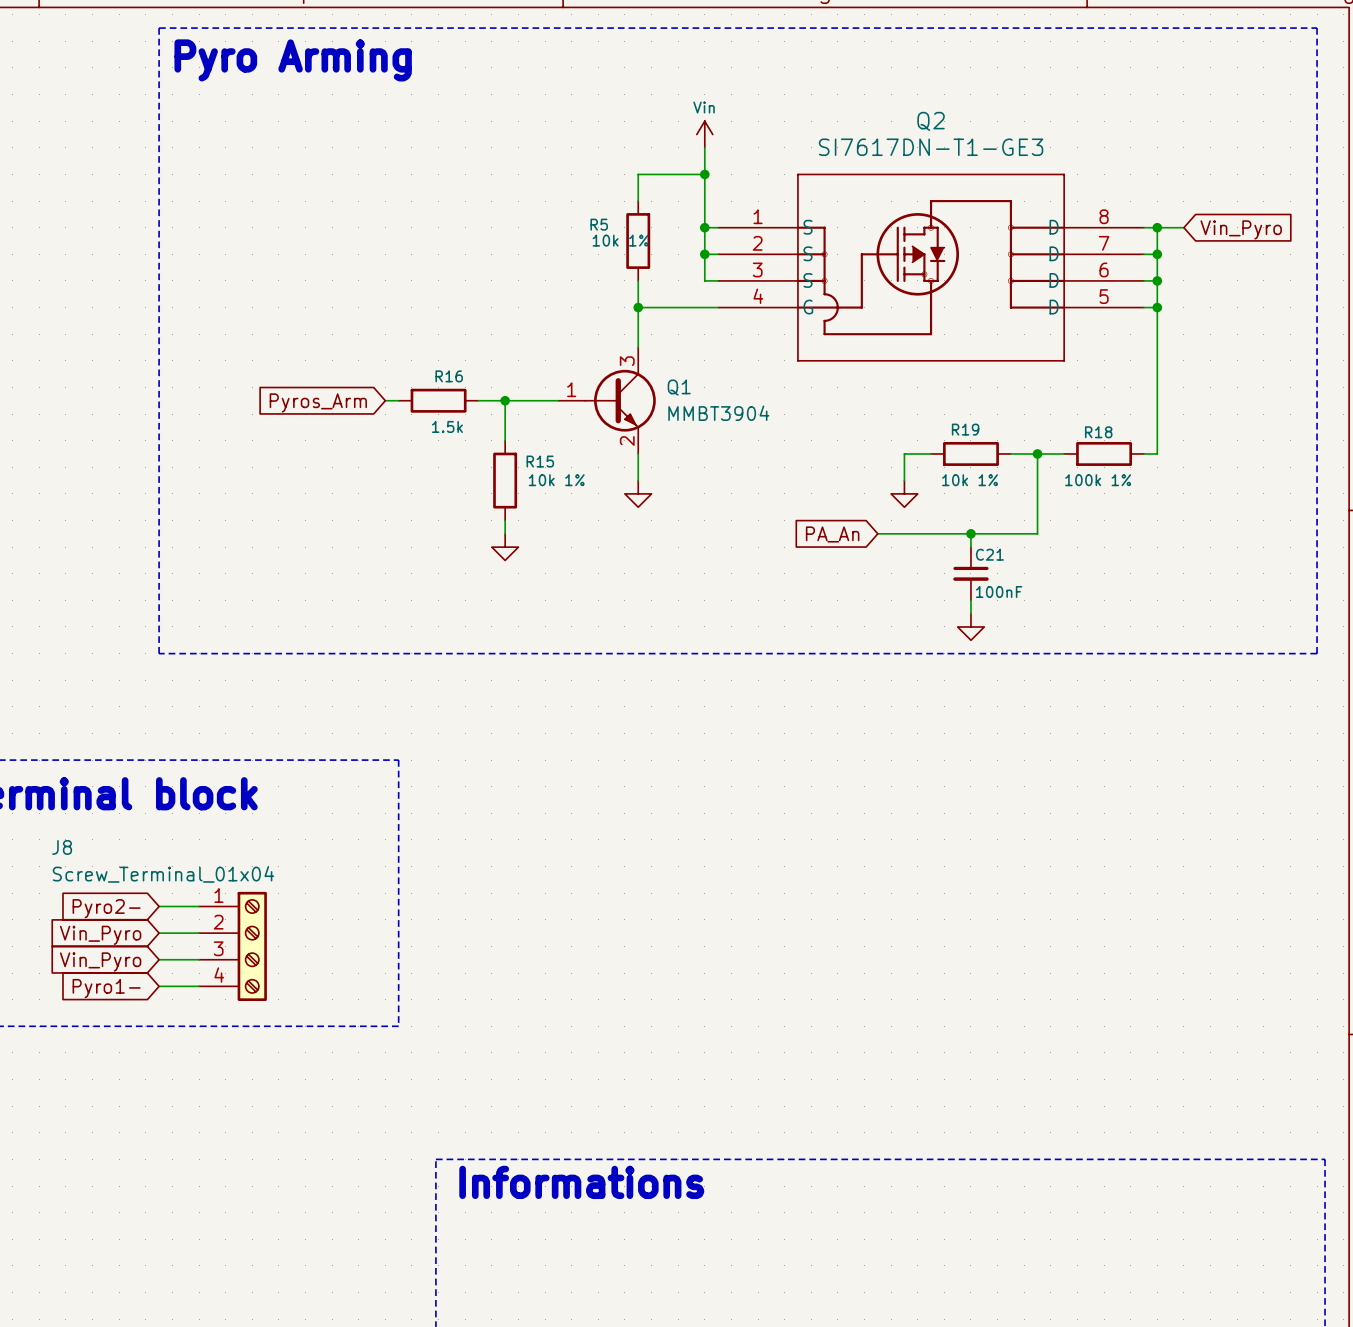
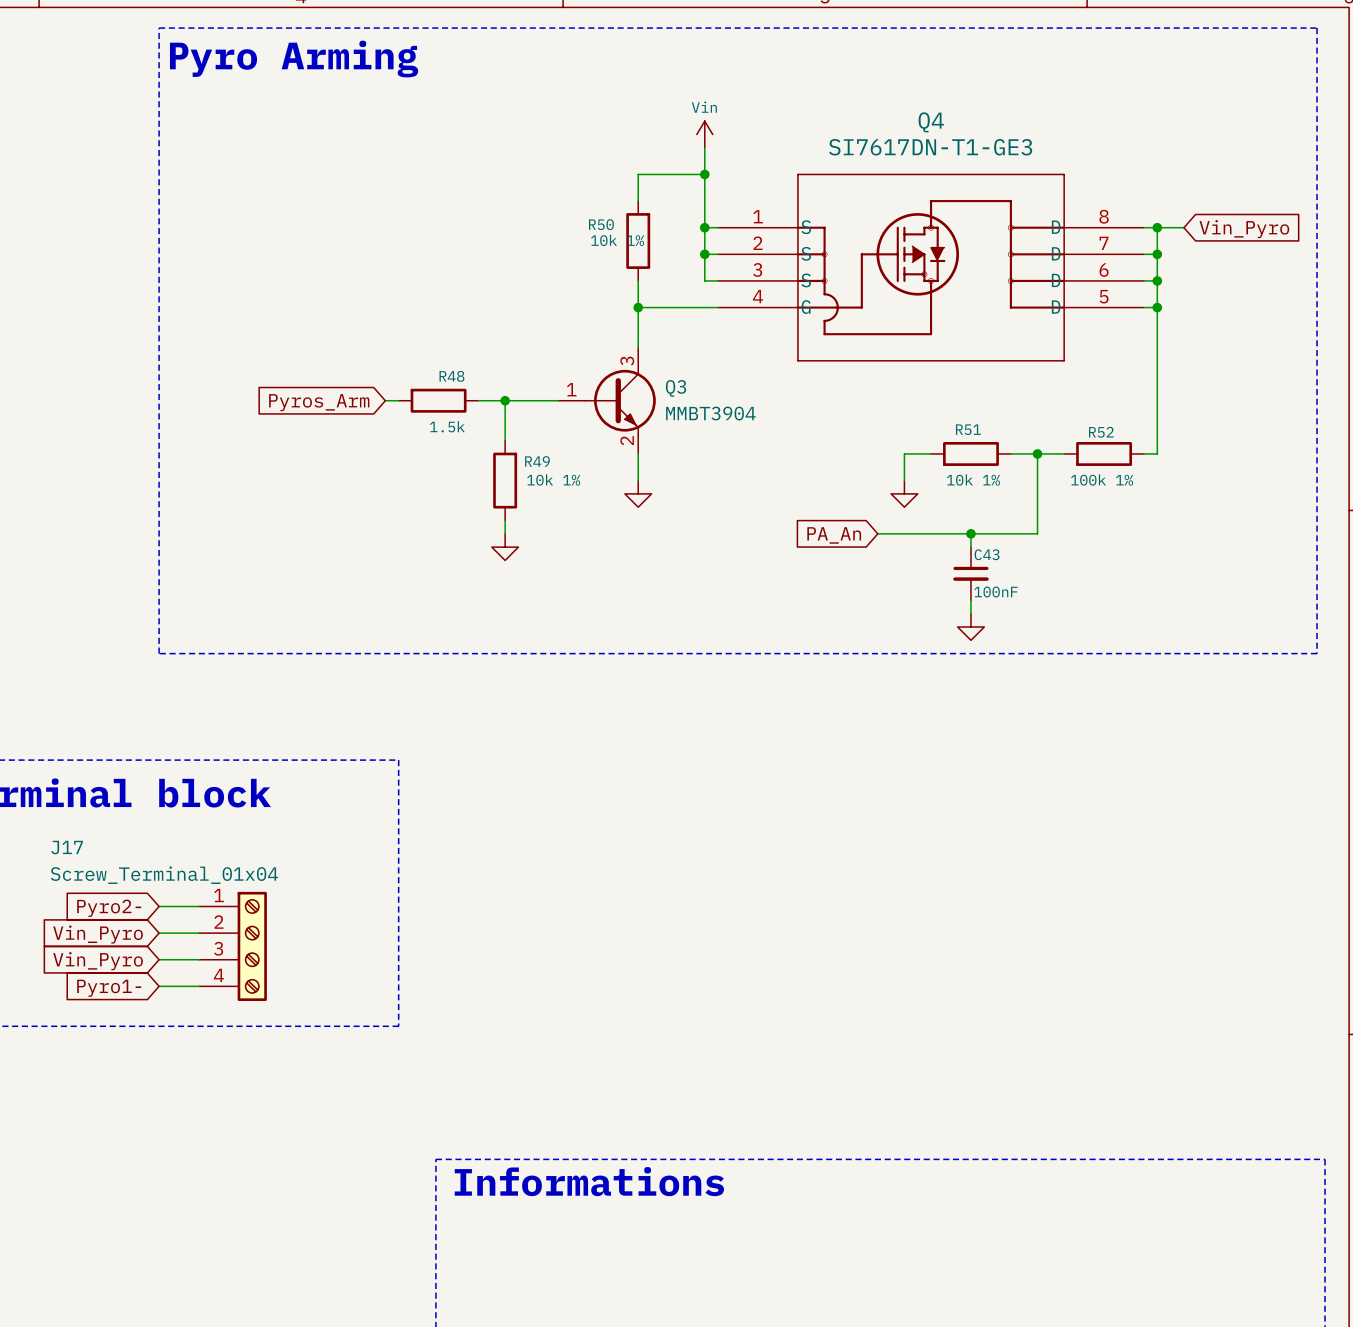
Q2 name: Q2 (931, 121) -> Q4 (931, 122)
R5 name: R5 (599, 224) -> R50 (601, 224)
R16 name: R16 (449, 376) -> R48 (451, 376)
Q1 name: Q1 (679, 387) -> Q3 (676, 388)
R19 name: R19 (965, 429) -> R51 (968, 429)
R18 name: R18 (1098, 432) -> R52 (1101, 432)
R15 name: R15 (540, 461) -> R49 (537, 461)
C21 name: C21 (989, 554) -> C43 (987, 554)
J8 name: J8 (62, 847) -> J17 (67, 847)

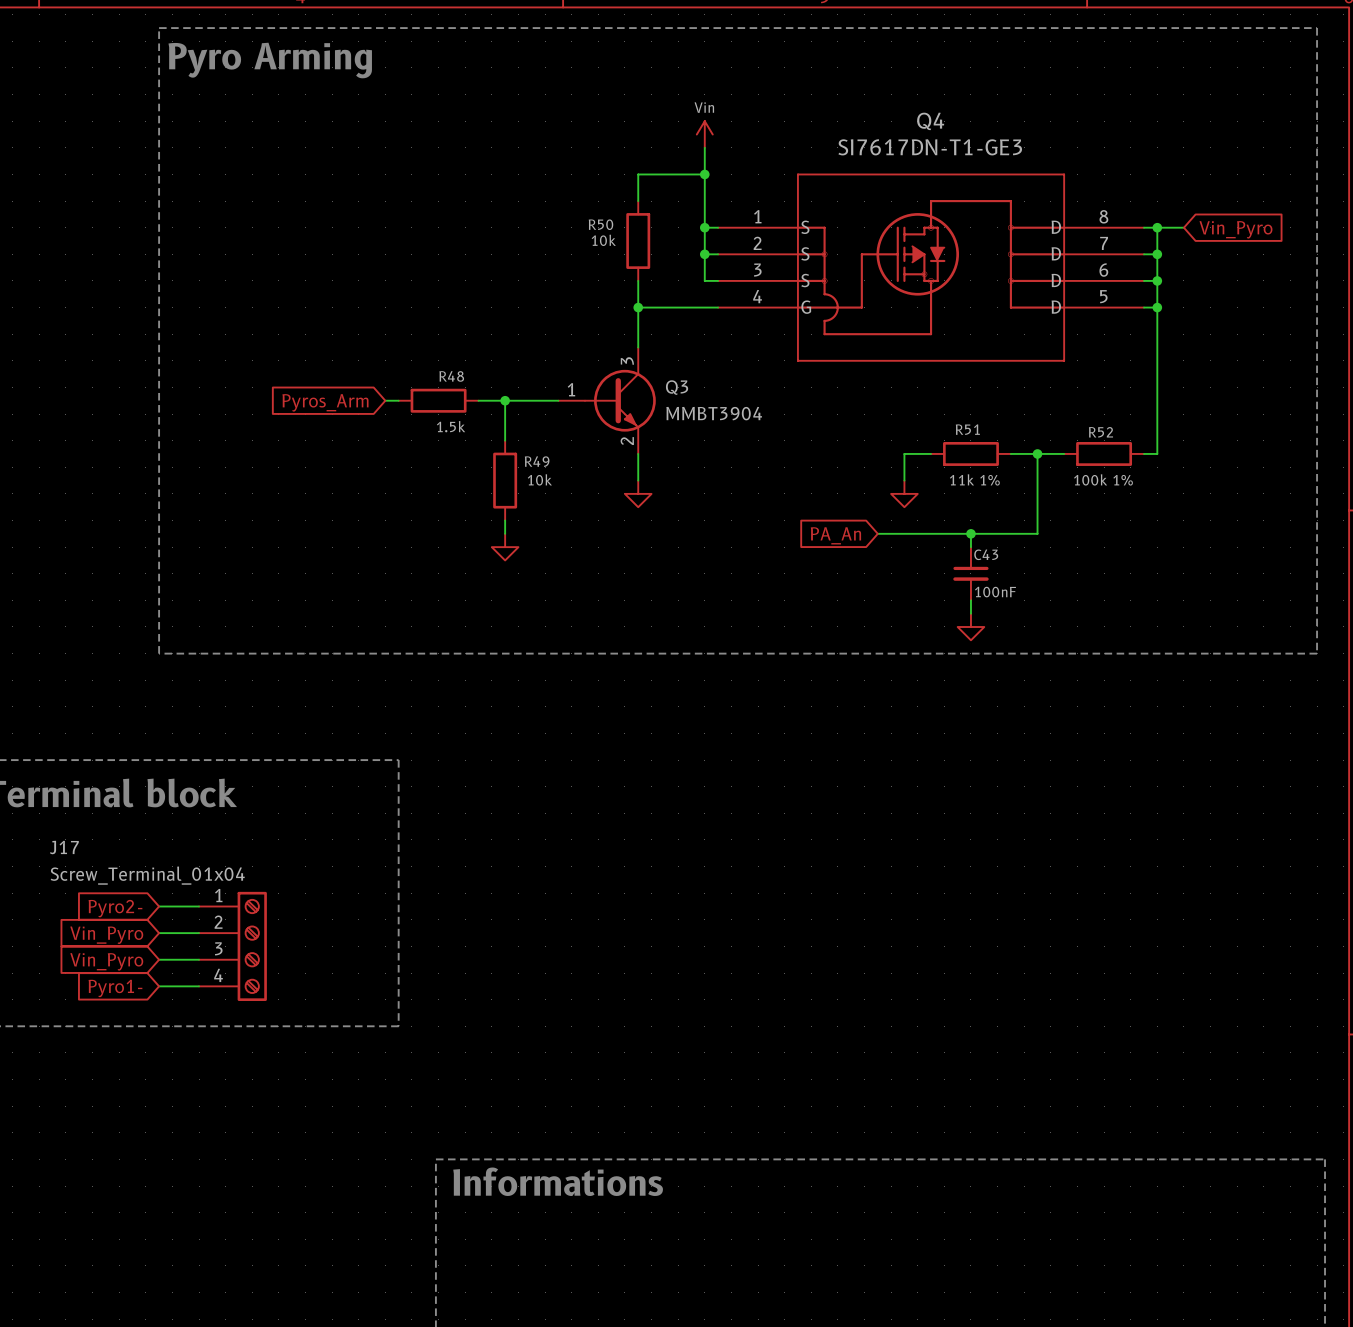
R50 value: 10k 1% (617, 240) -> 10k (603, 240)
R49 value: 10k 1% (553, 479) -> 10k (539, 479)
R51 value: 10k 1% (973, 479) -> 11k 1% (974, 479)

